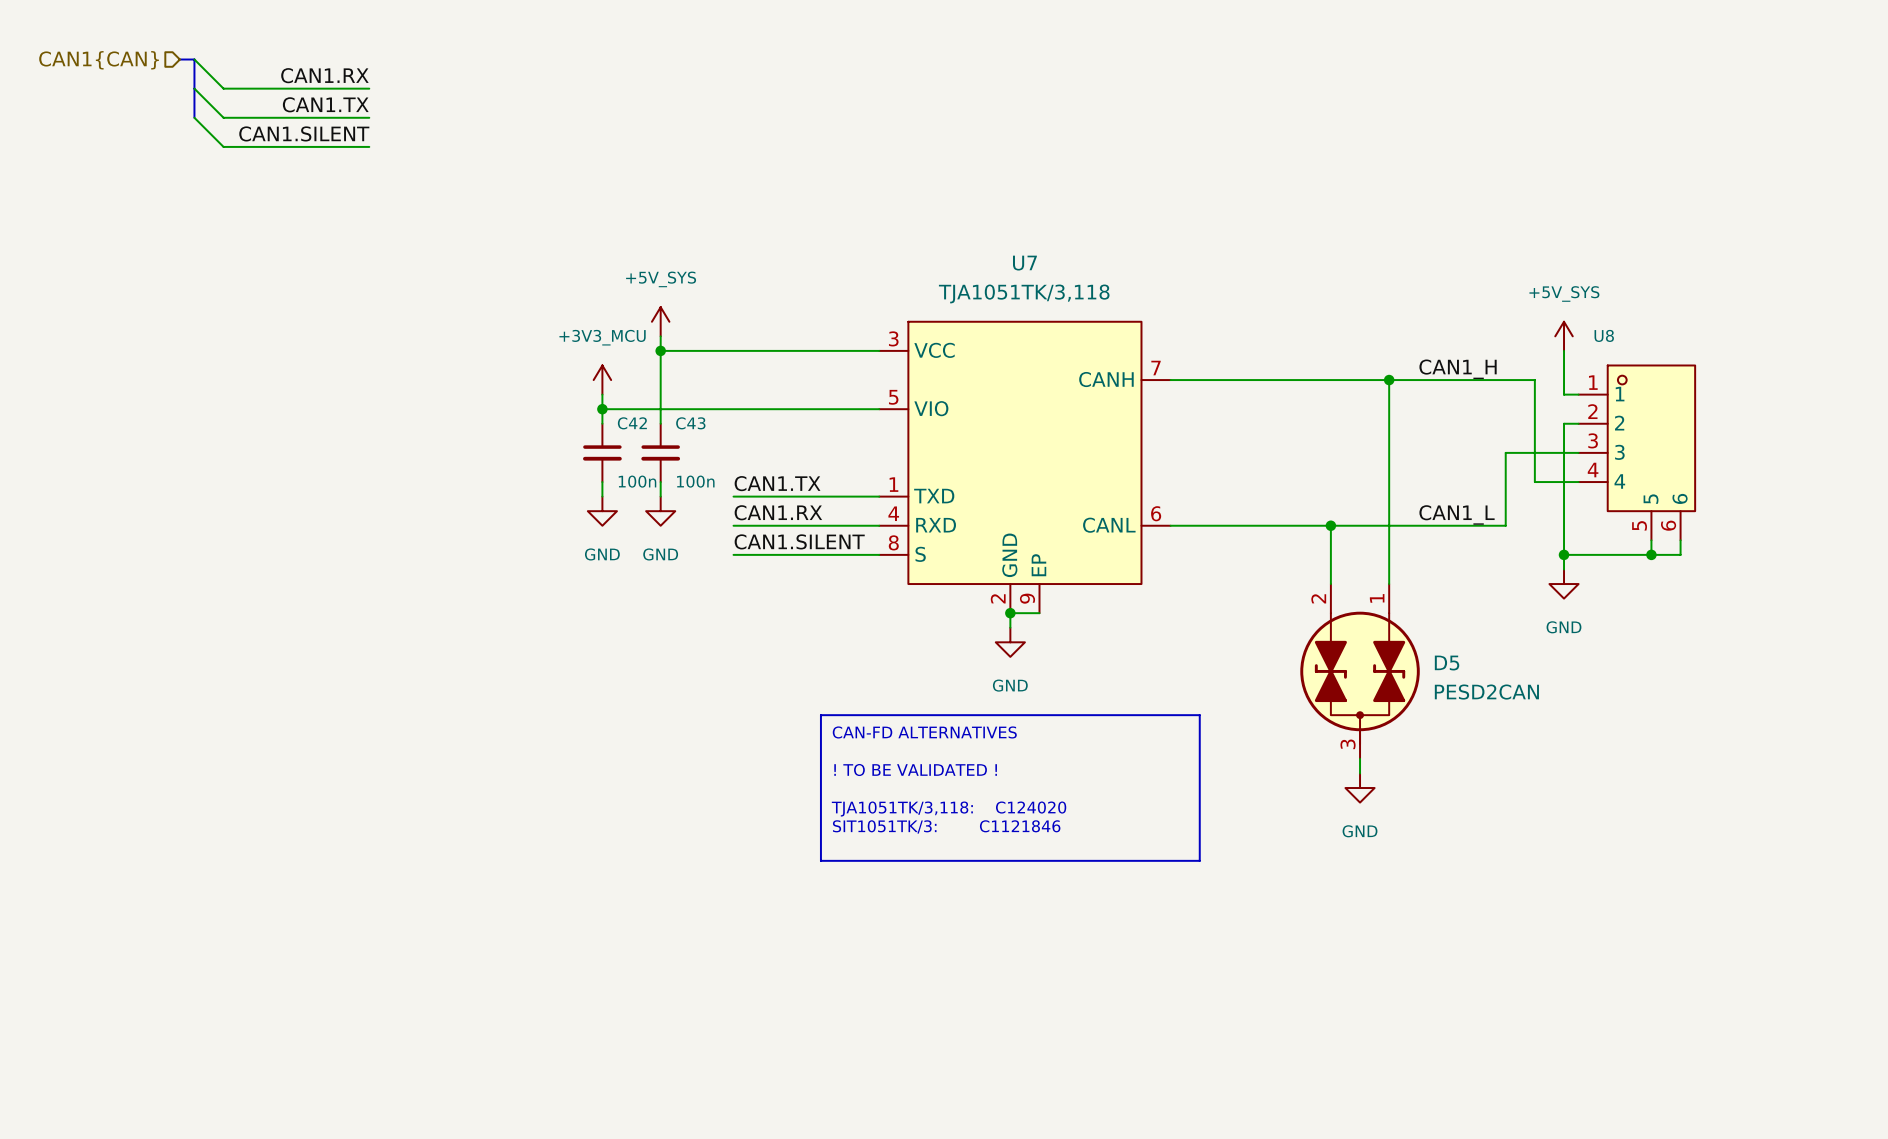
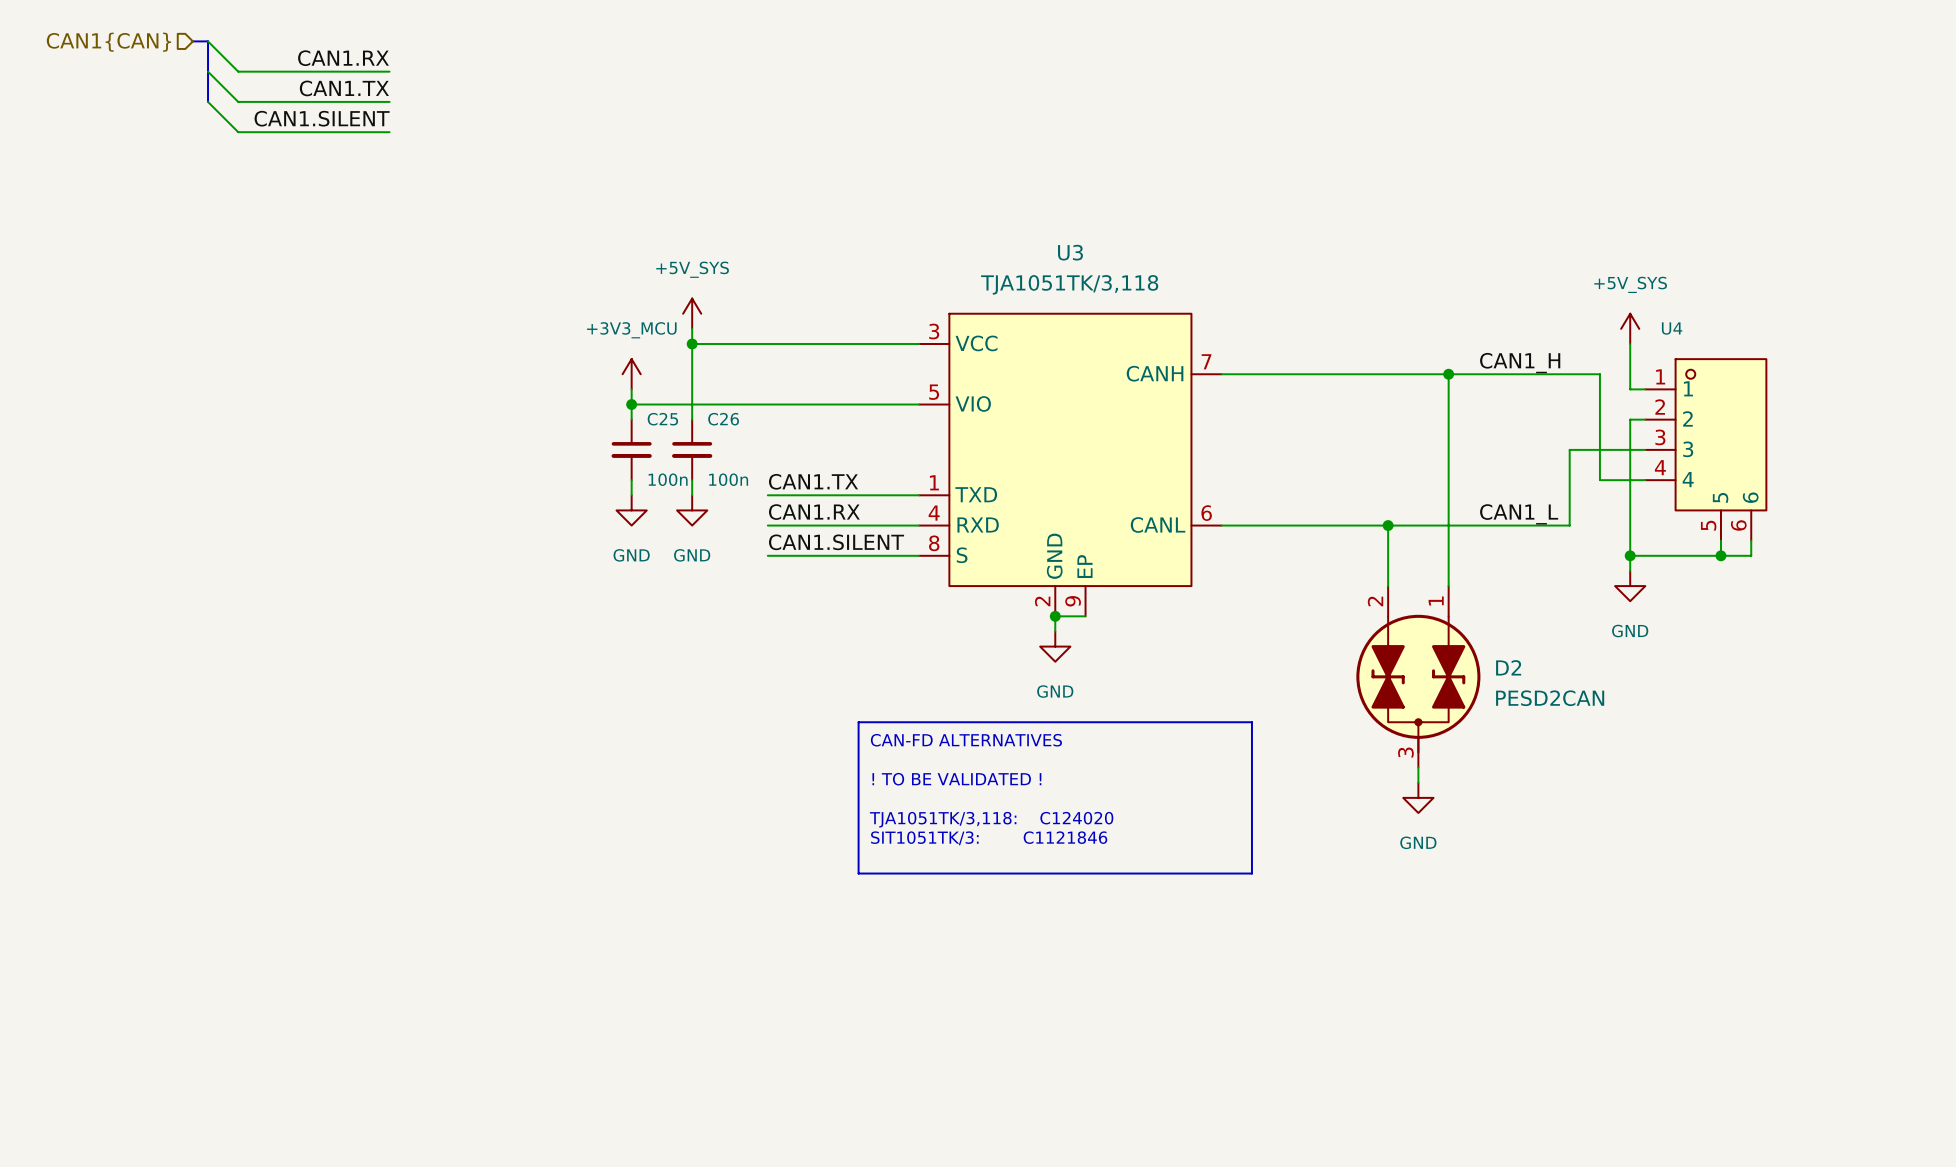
U7 name: U7 (1024, 263) -> U3 (1070, 252)
U8 name: U8 (1604, 335) -> U4 (1672, 328)
C42 name: C42 (632, 423) -> C25 (662, 419)
C43 name: C43 (690, 423) -> C26 (723, 419)
D5 name: D5 (1447, 663) -> D2 (1508, 667)

